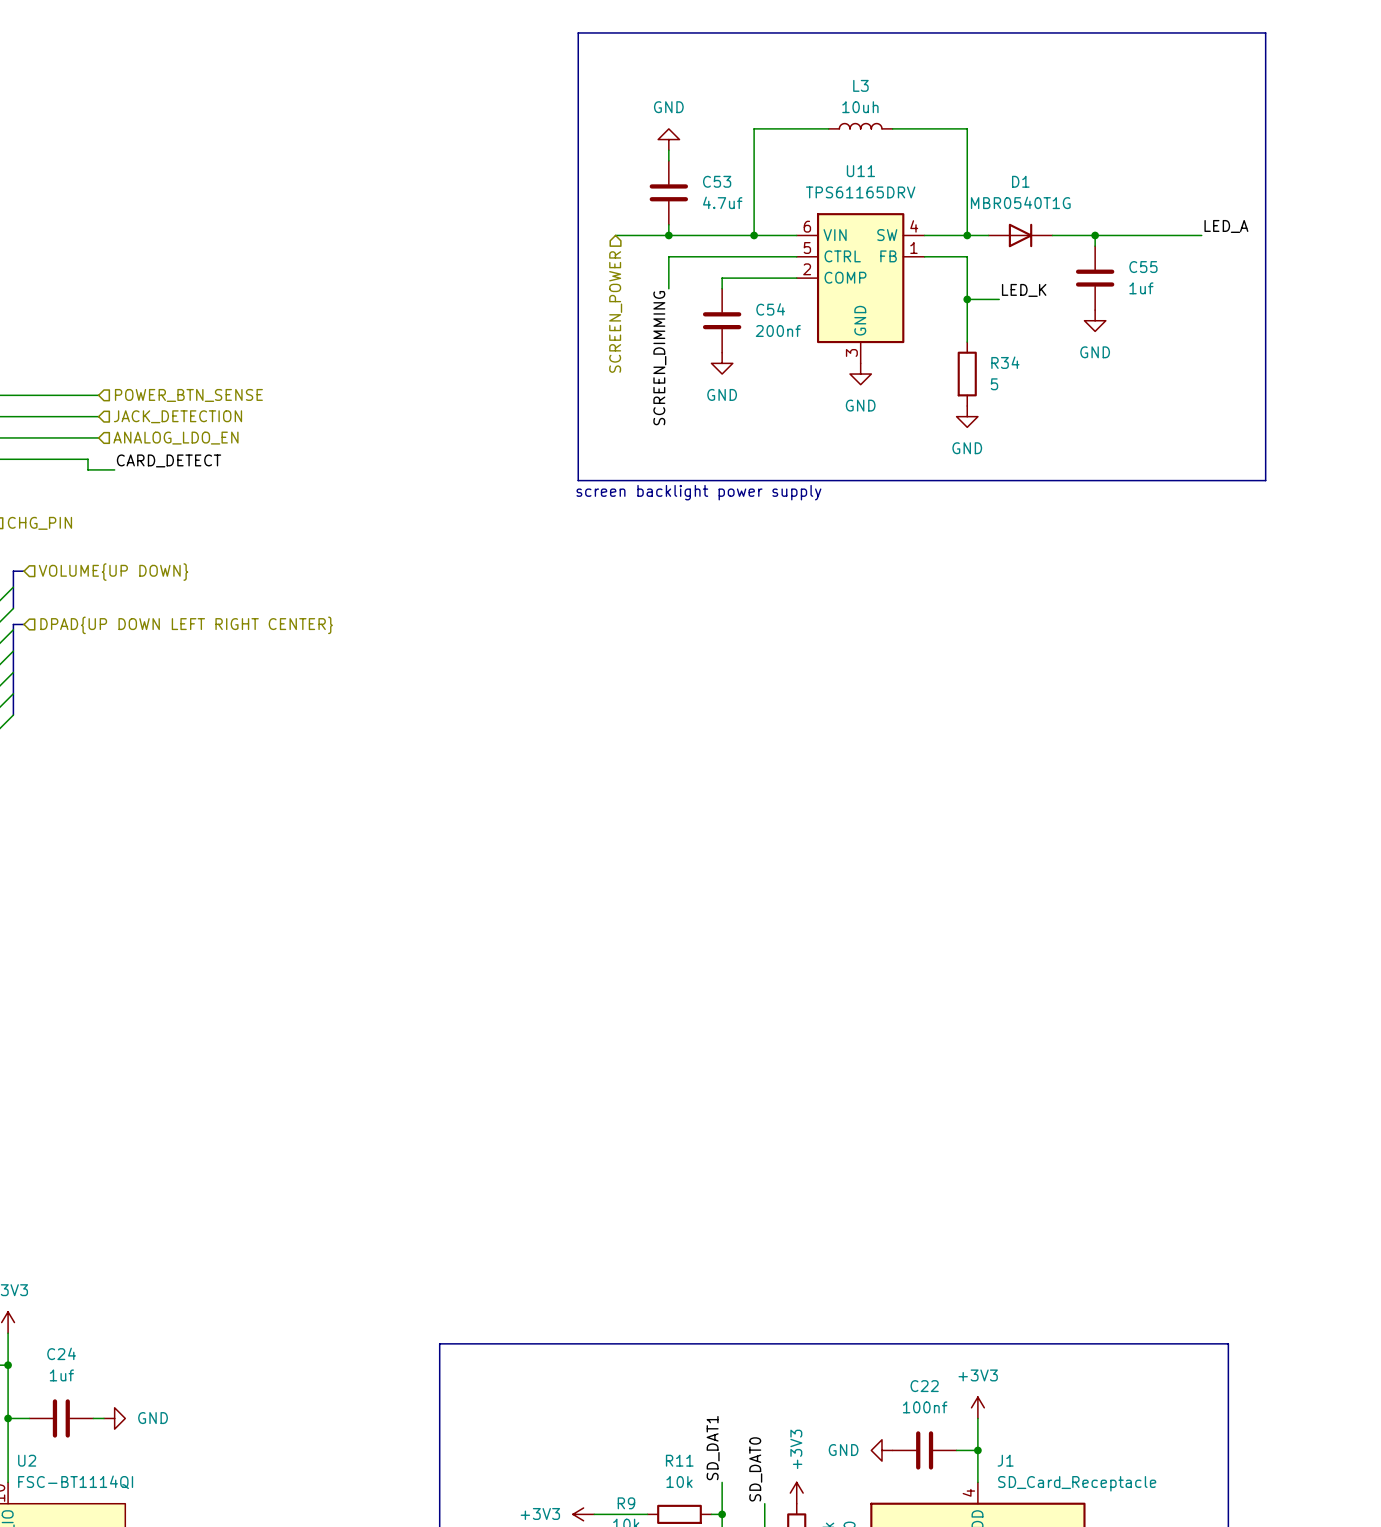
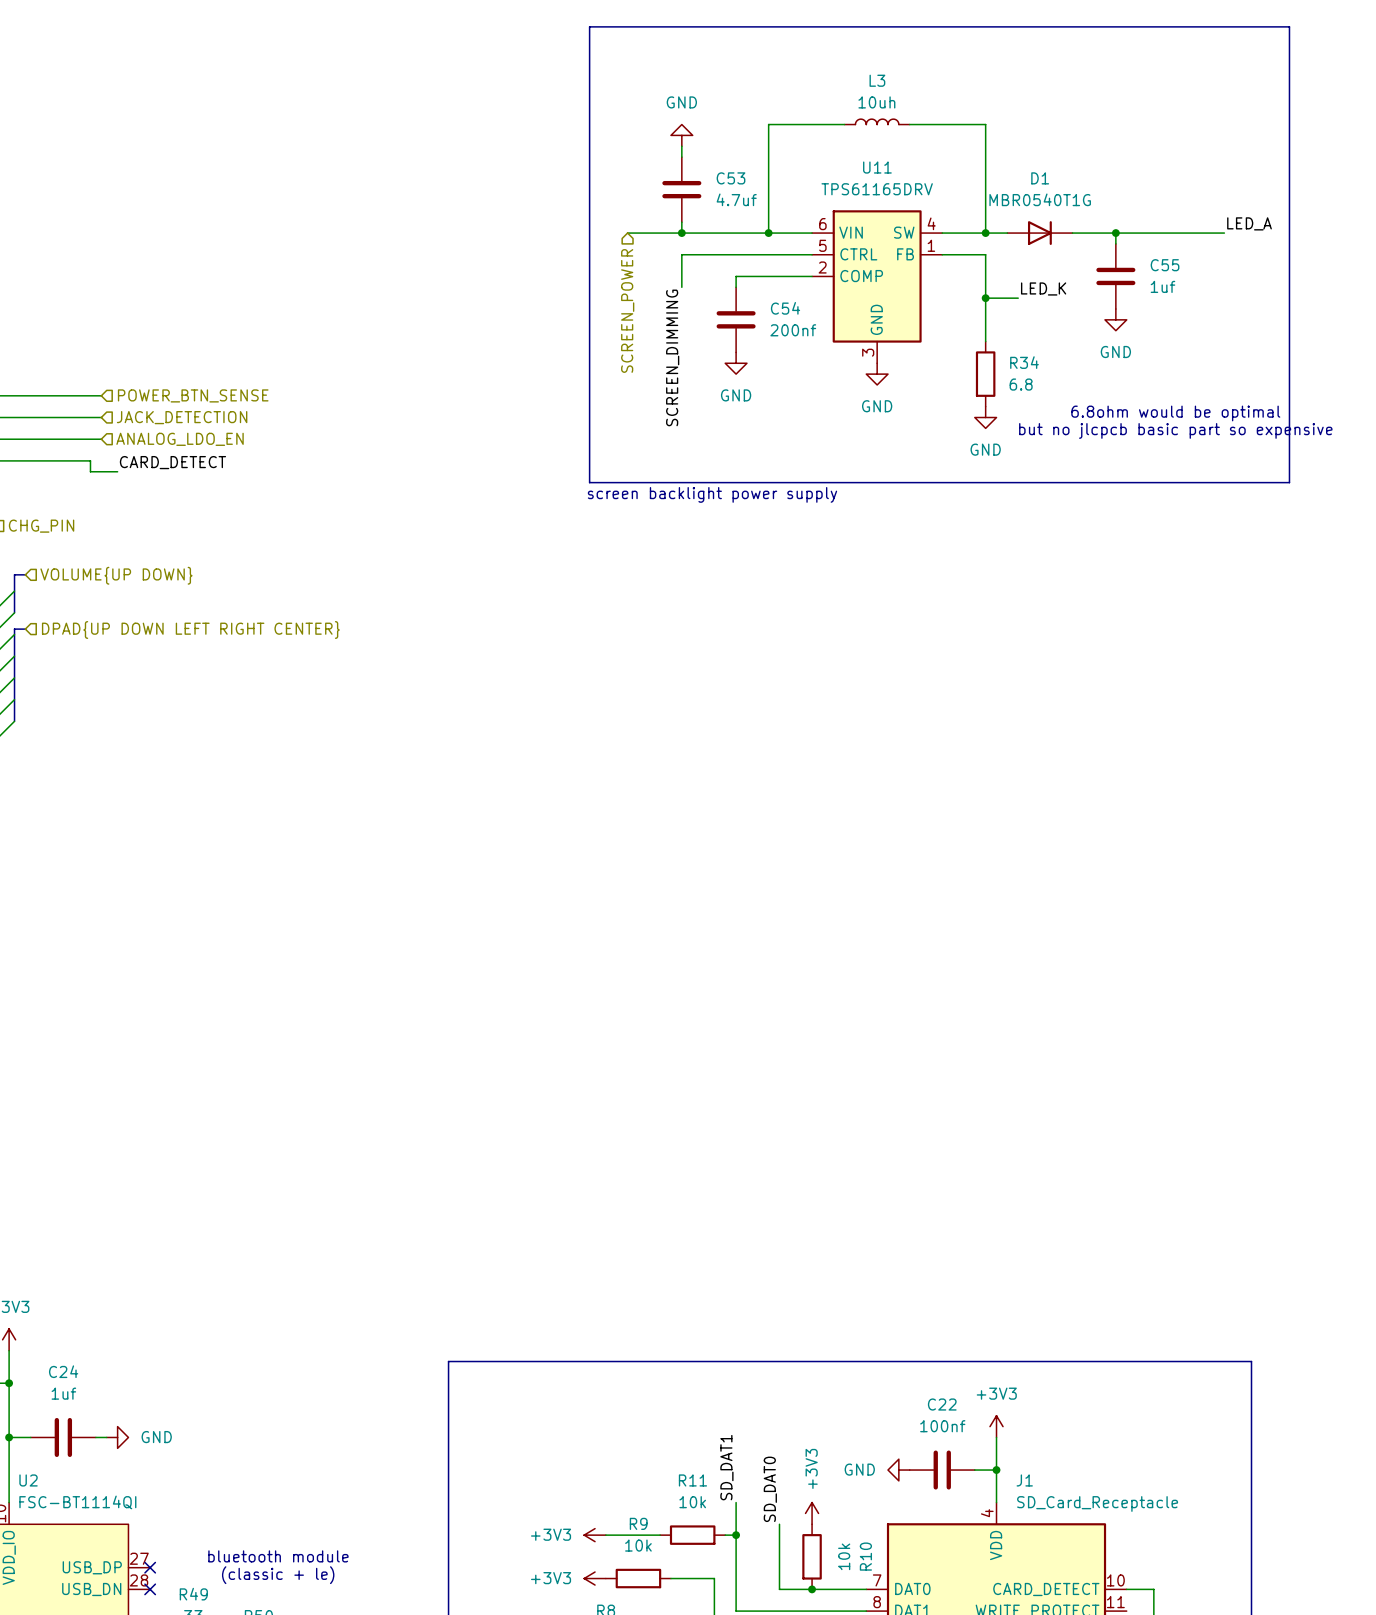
R34 value: 5 (994, 384) -> 6.8 (1021, 384)
text: none -> 6.8ohm would be optimal (1175, 413)
text: none -> but no jlcpcb basic part so expensive (1175, 430)

